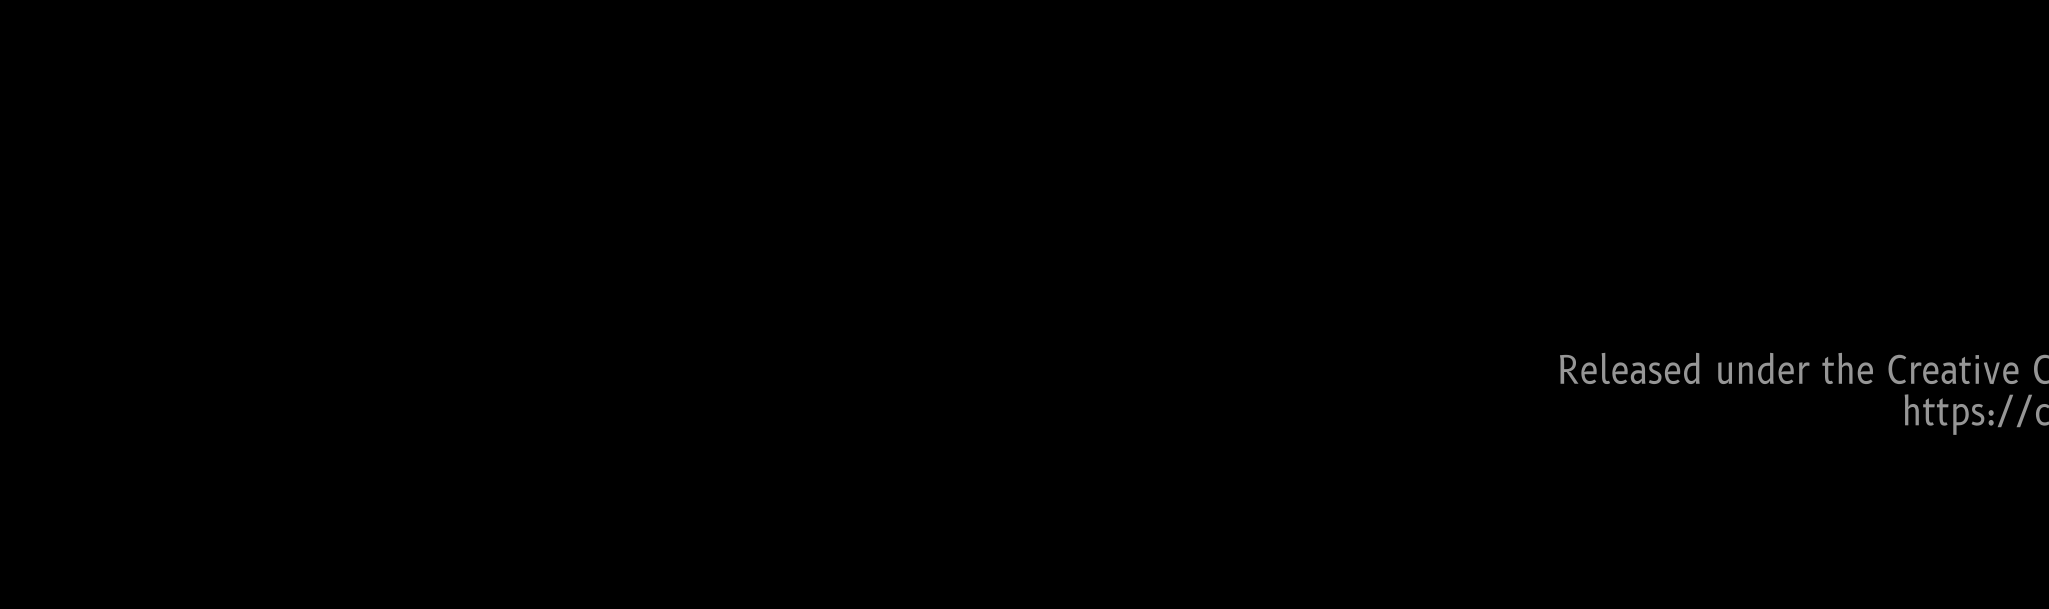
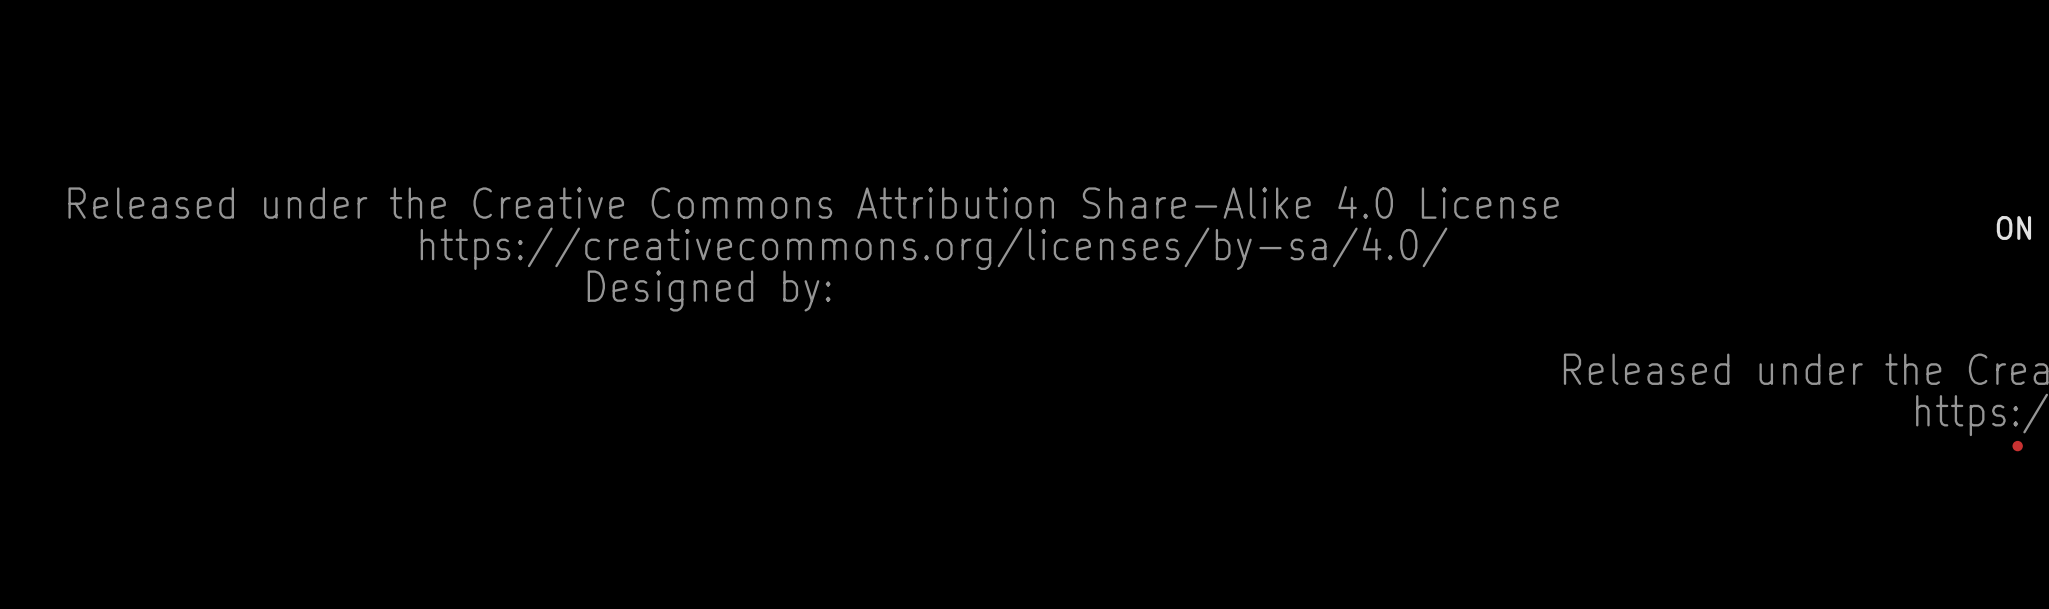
drawing: none -> [68, 185, 1559, 312]
text: none -> ON (2013, 228)
part: none -> (2017, 446)

